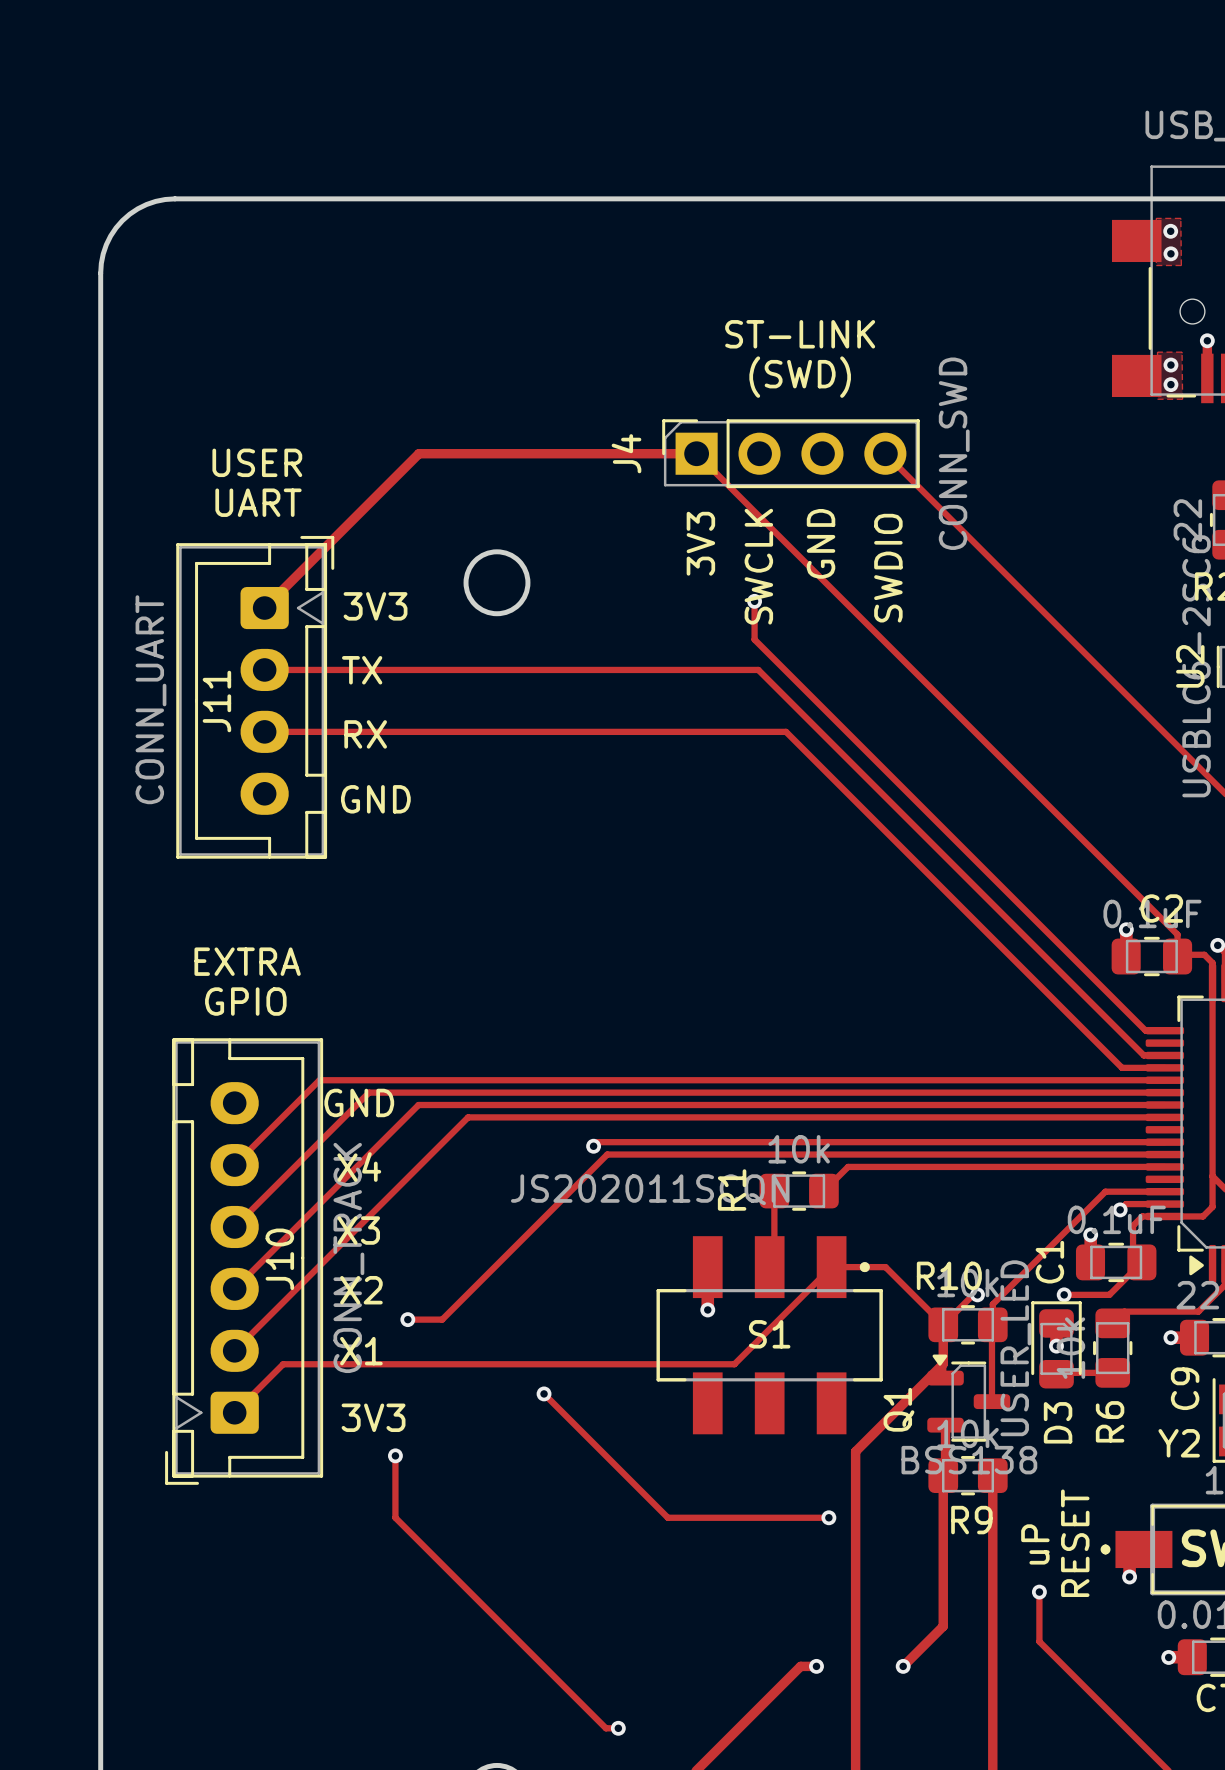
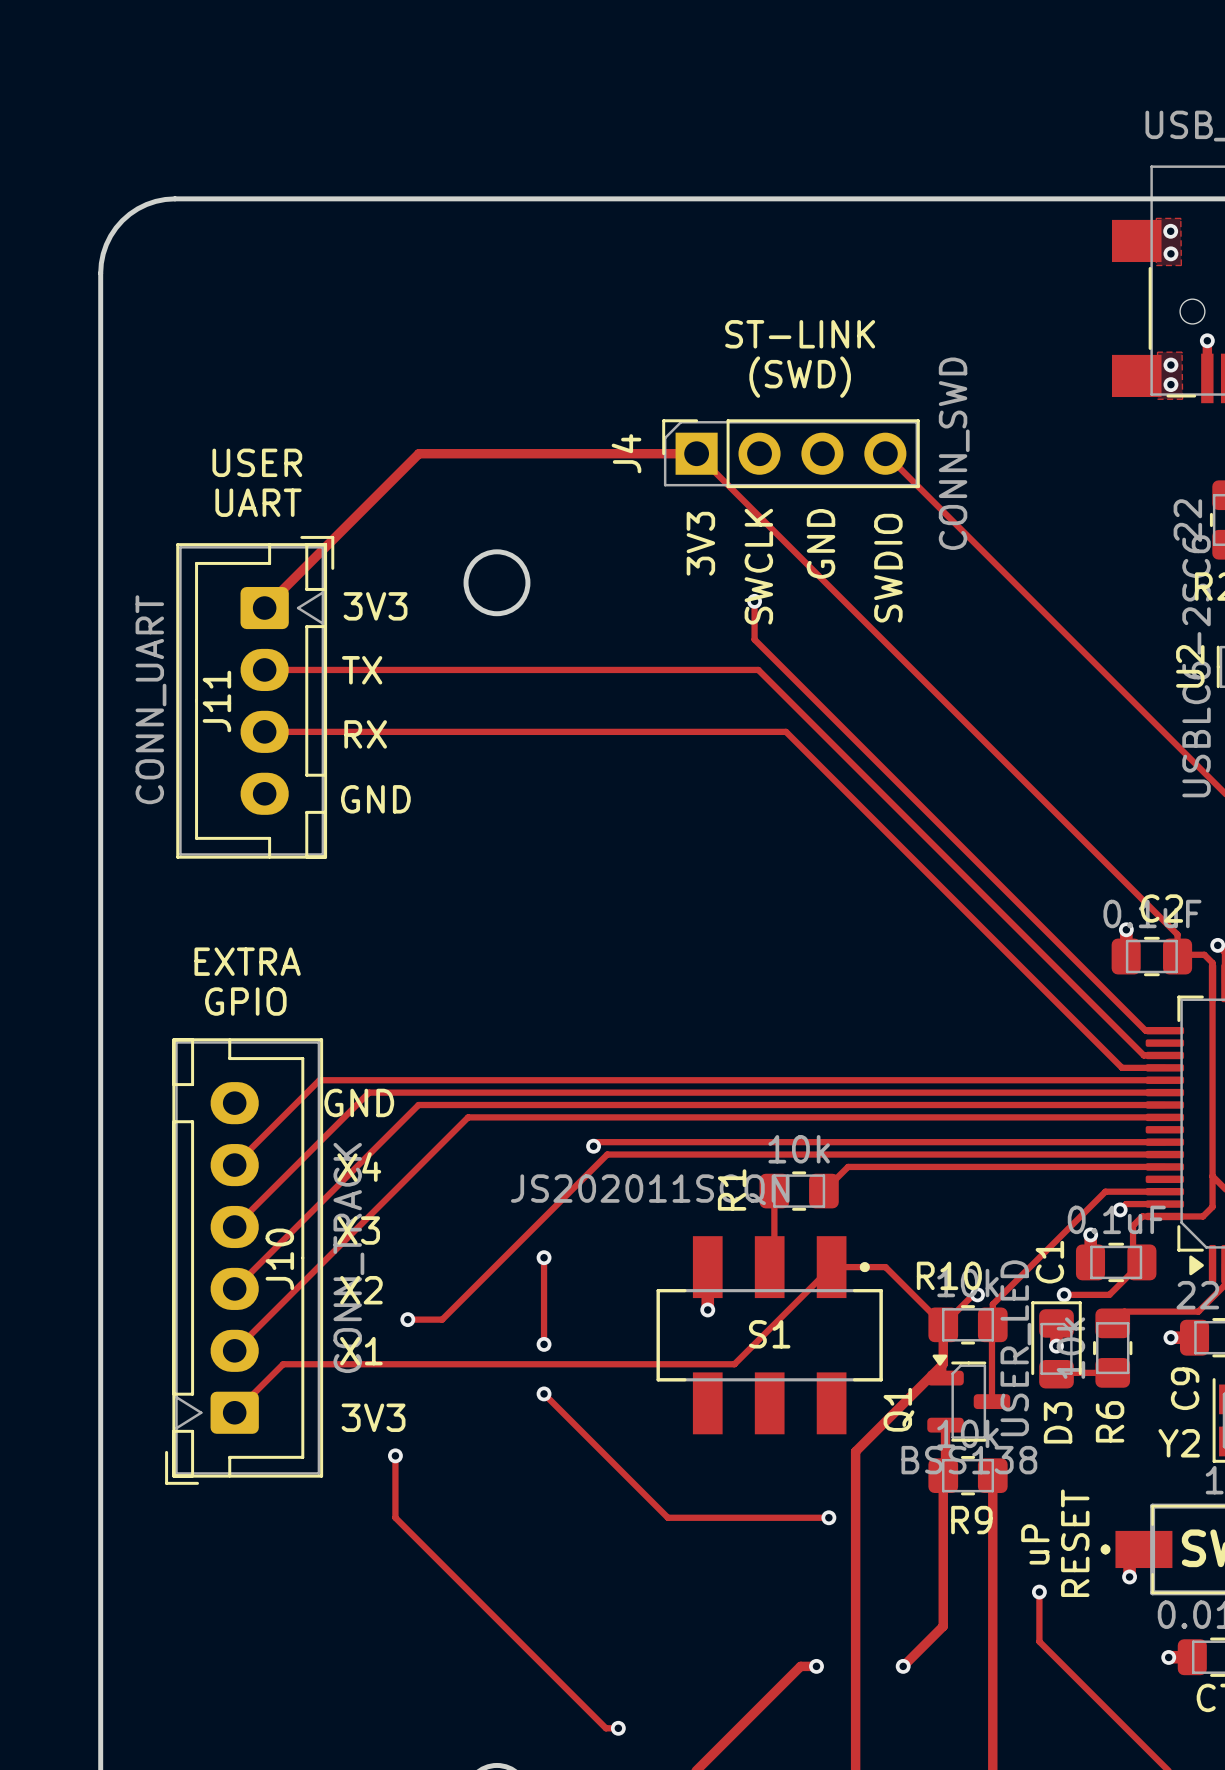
track: none -> (544, 1257) (544, 1344)
via: none -> (544, 1257)
via: none -> (544, 1344)

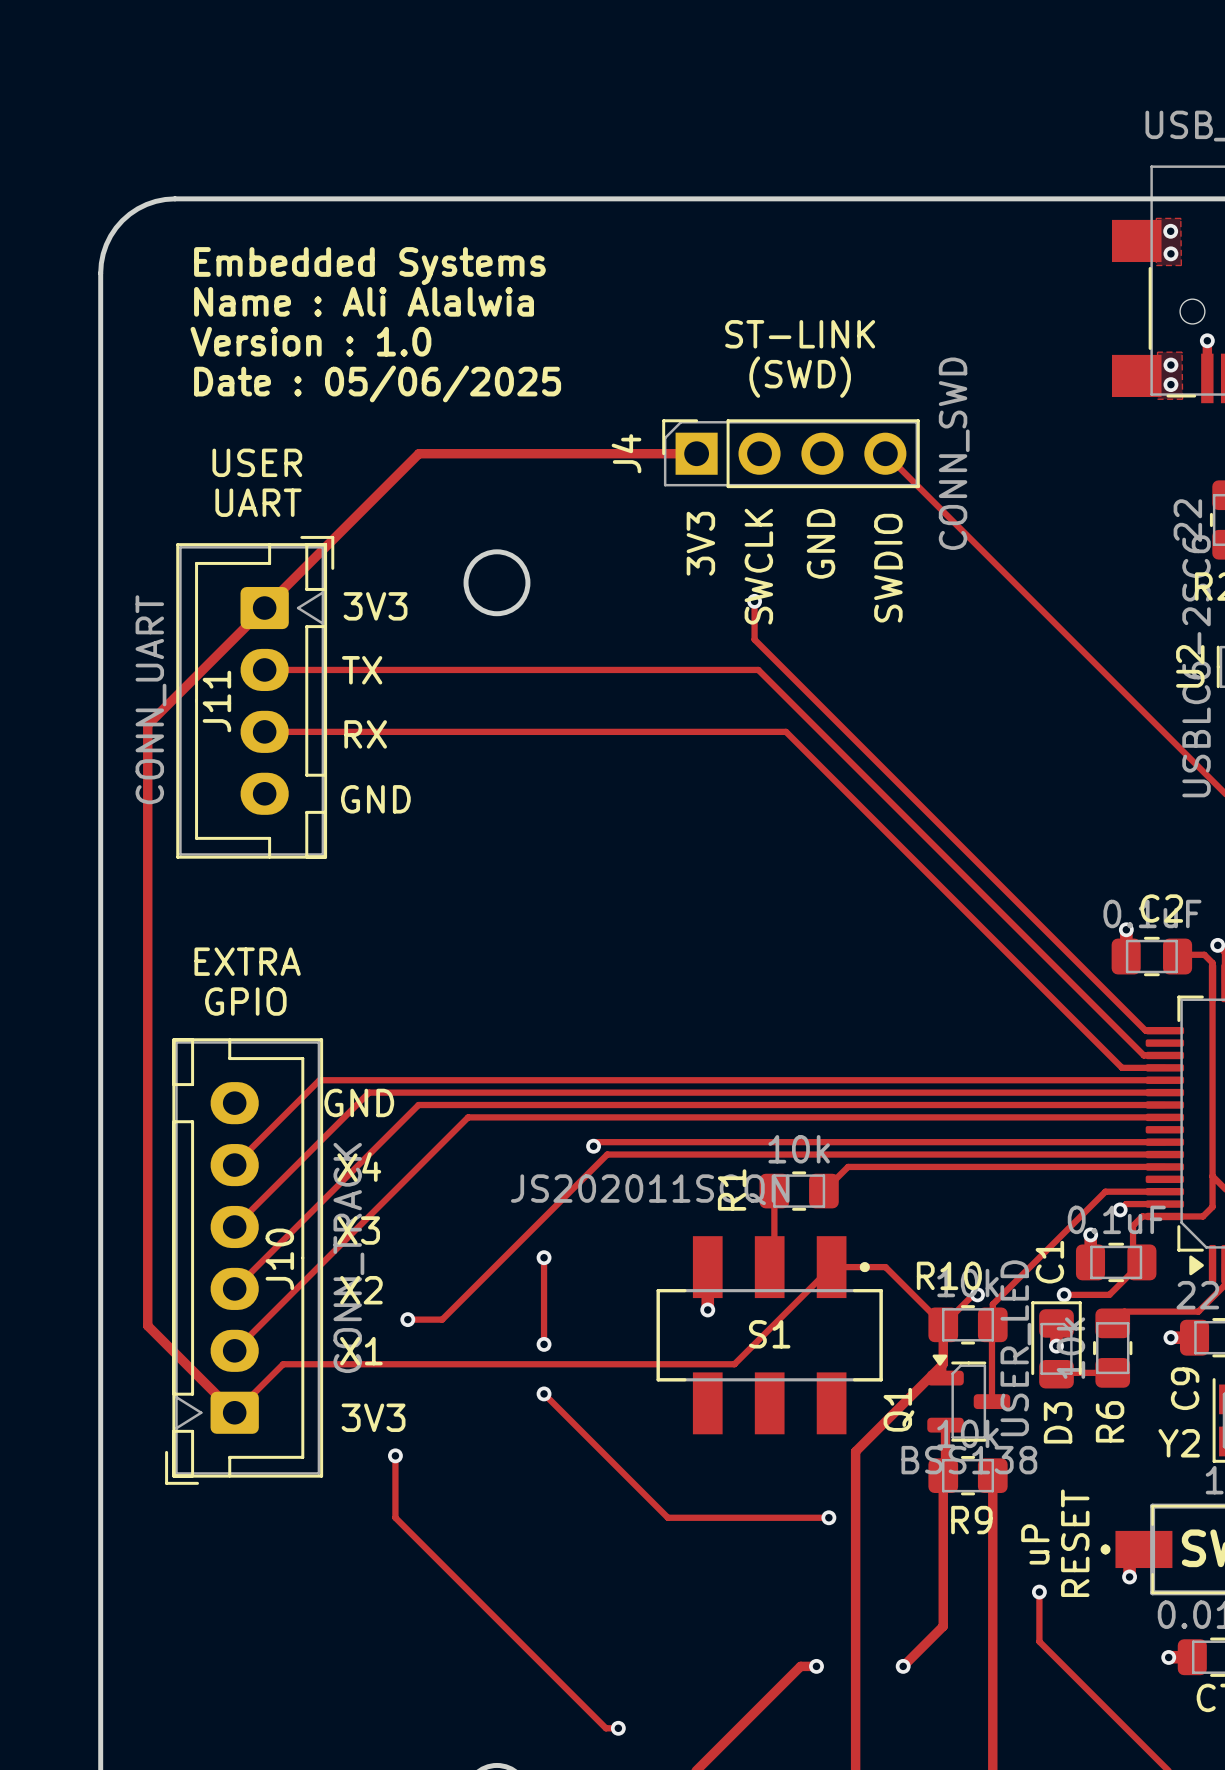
text: none -> Embedded Systems (369, 266)
text: none -> Name : Ali Alalwia (364, 301)
text: none -> Version : 1.0 (310, 341)
text: none -> Date : 05/06/2025 (377, 383)
track: (696, 453) (1177, 934) (1177, 956) -> none
track: none -> (264, 608) (147, 724) (147, 1325) (234, 1412)

